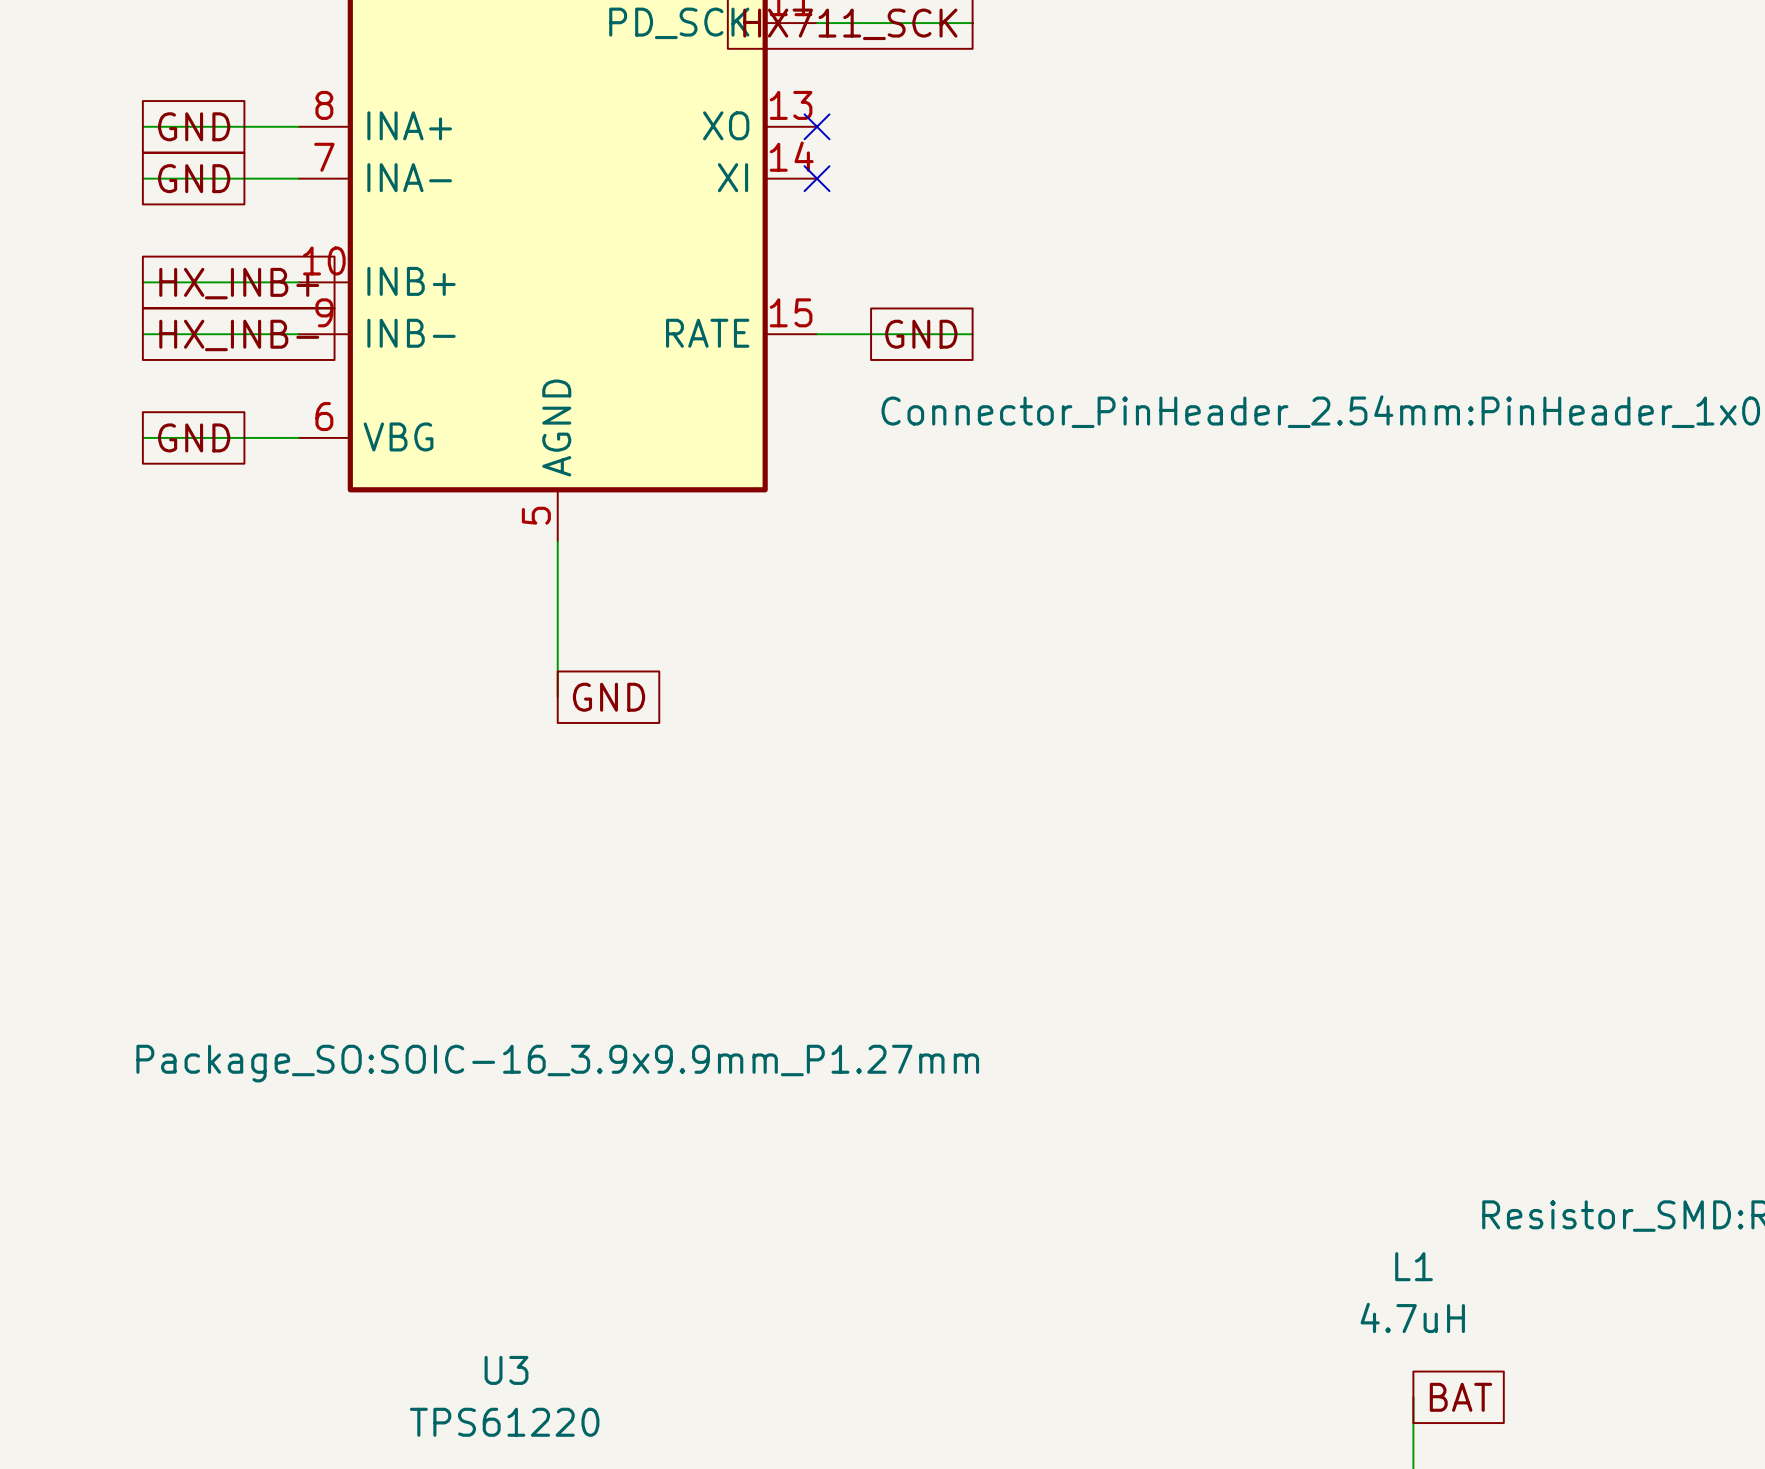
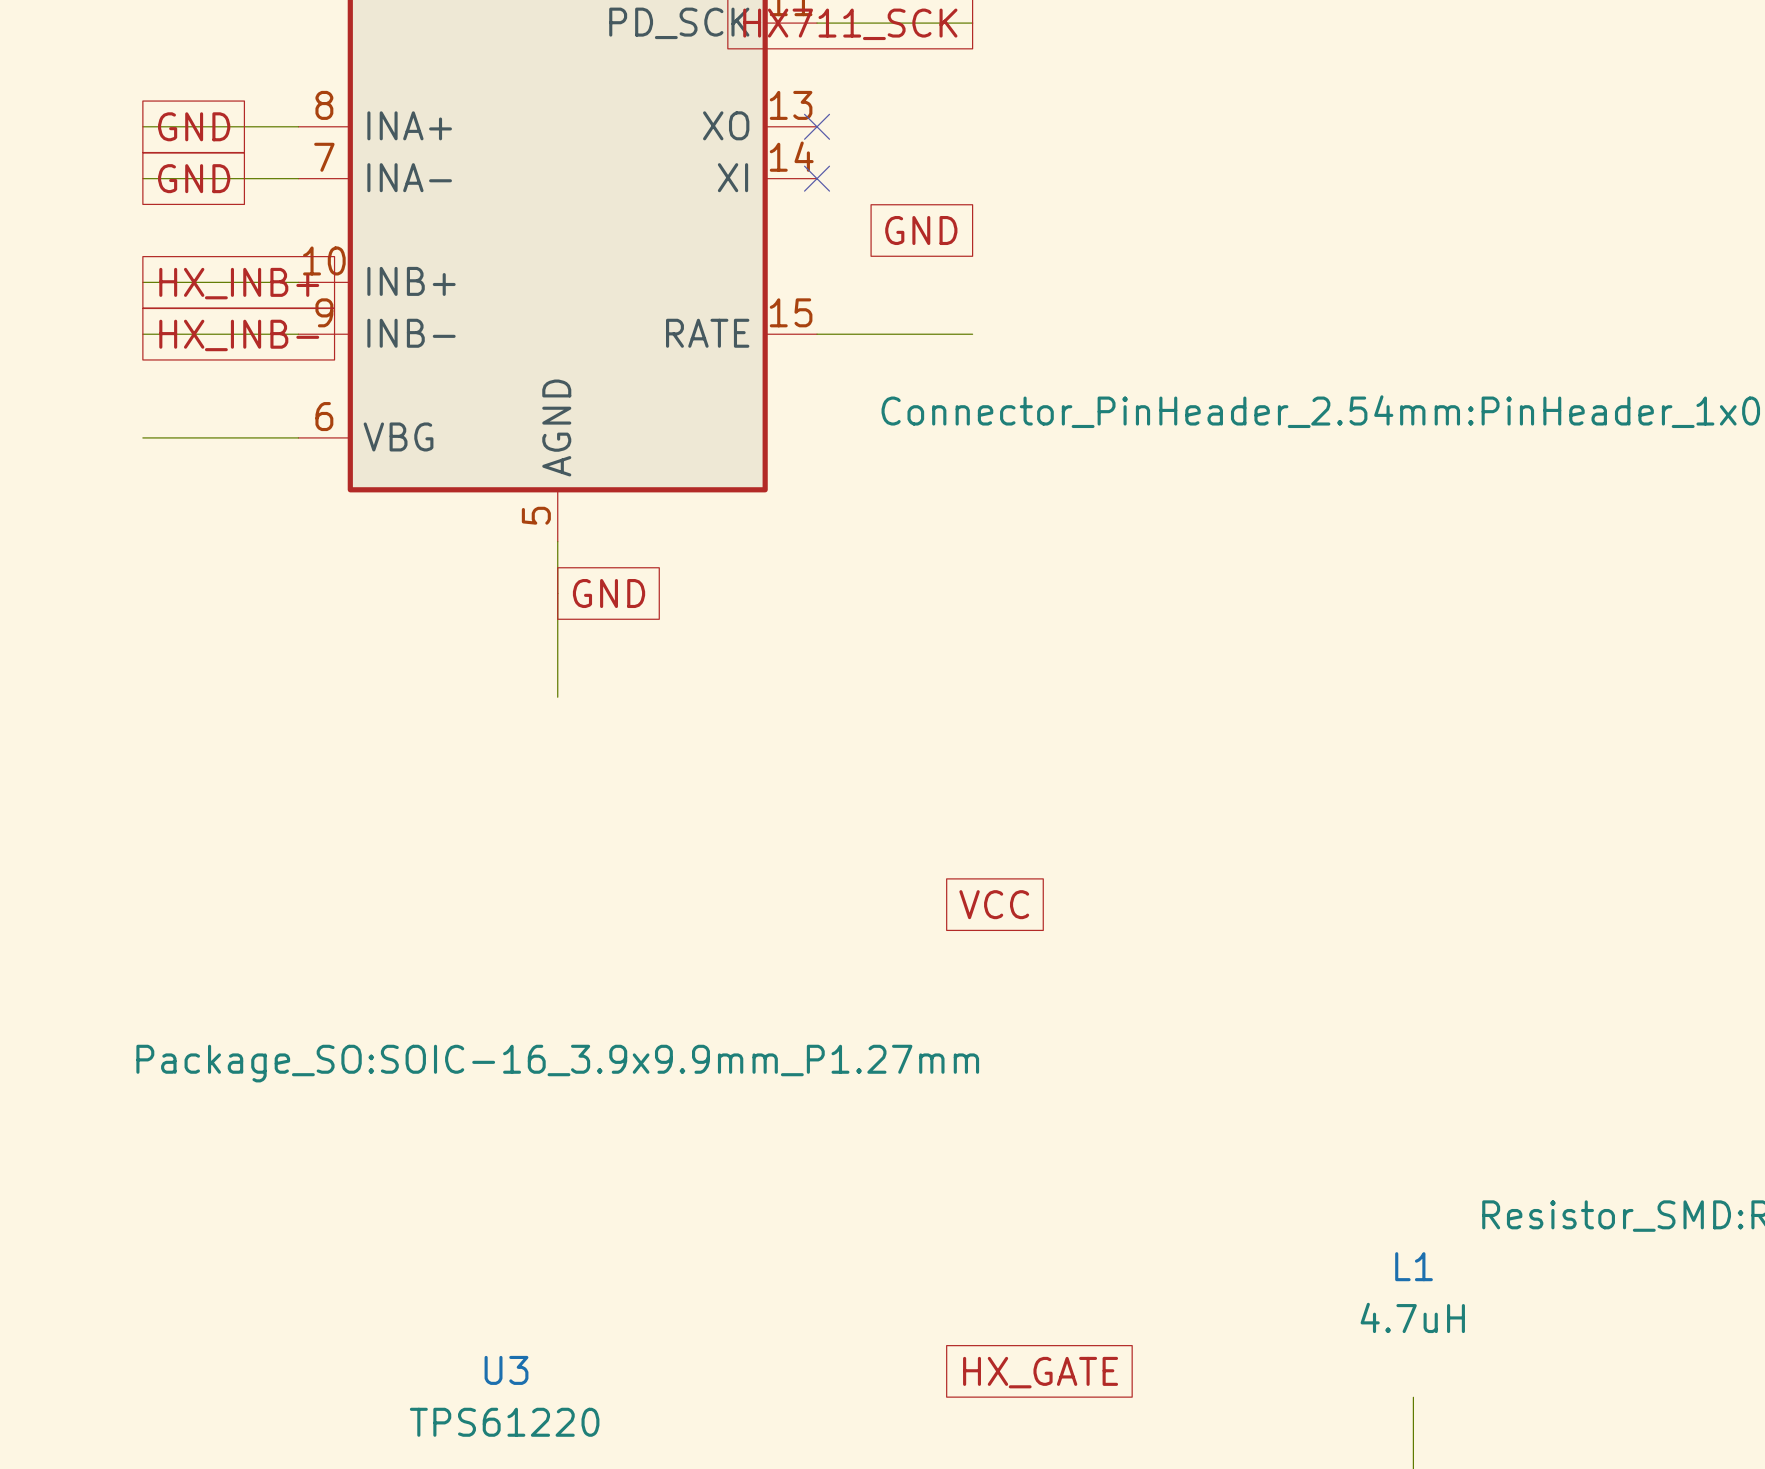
global label position: GND (921, 334) -> GND (921, 230)
global label: GND (194, 437) -> none
global label position: GND (609, 697) -> GND (609, 593)
global label: none -> VCC (994, 904)
global label: none -> HX_GATE (1040, 1372)
global label: BAT (1460, 1397) -> none

